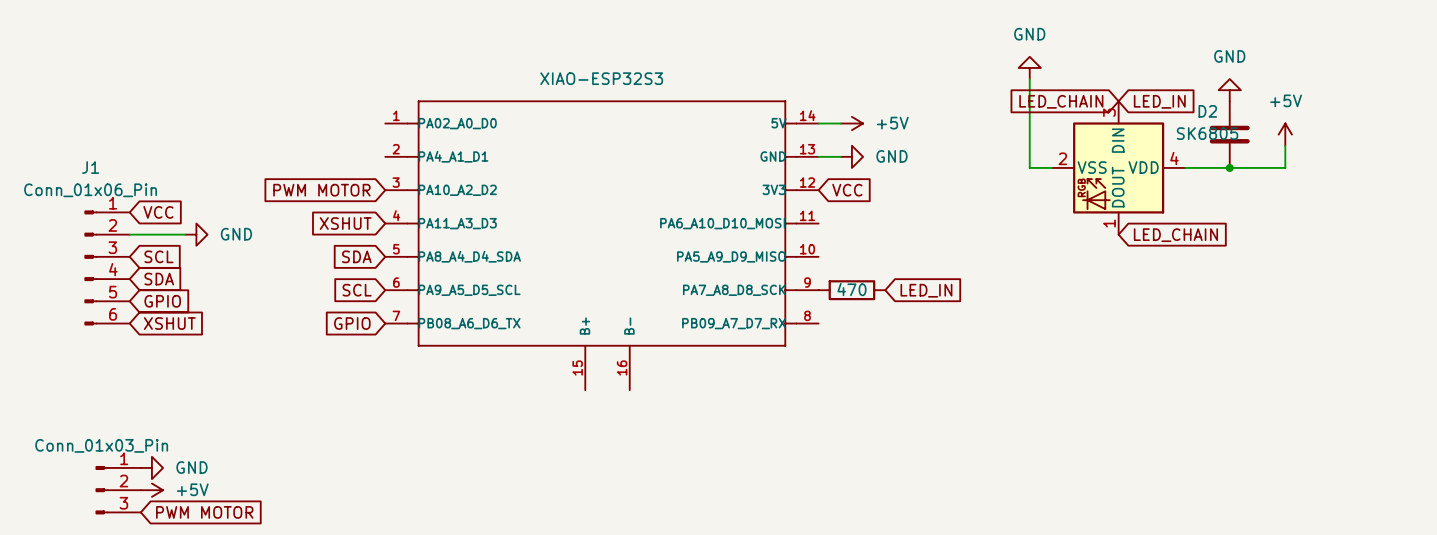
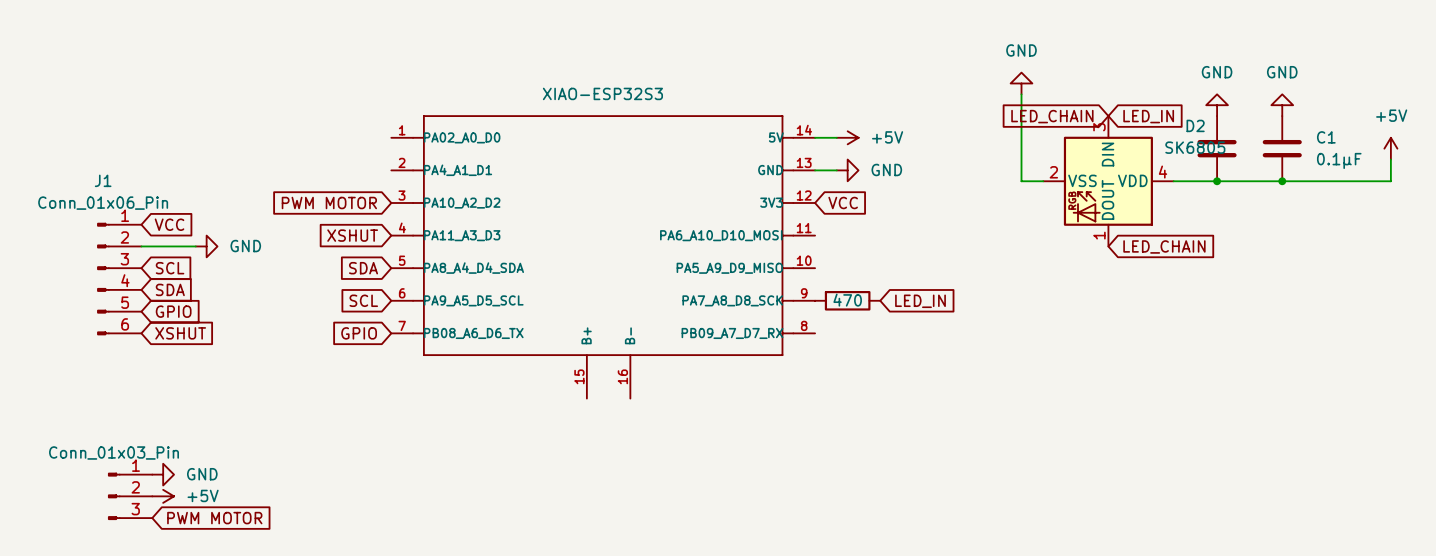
power symbol: none -> GND (1282, 105)
power symbol position: +5V (1285, 134) -> +5V (1390, 148)
C1: none -> 0.1µF (1282, 148)
wire: (1285, 145) (1285, 167) -> (1390, 159) (1390, 181) (1271, 181)
junction: none -> (1282, 181)

